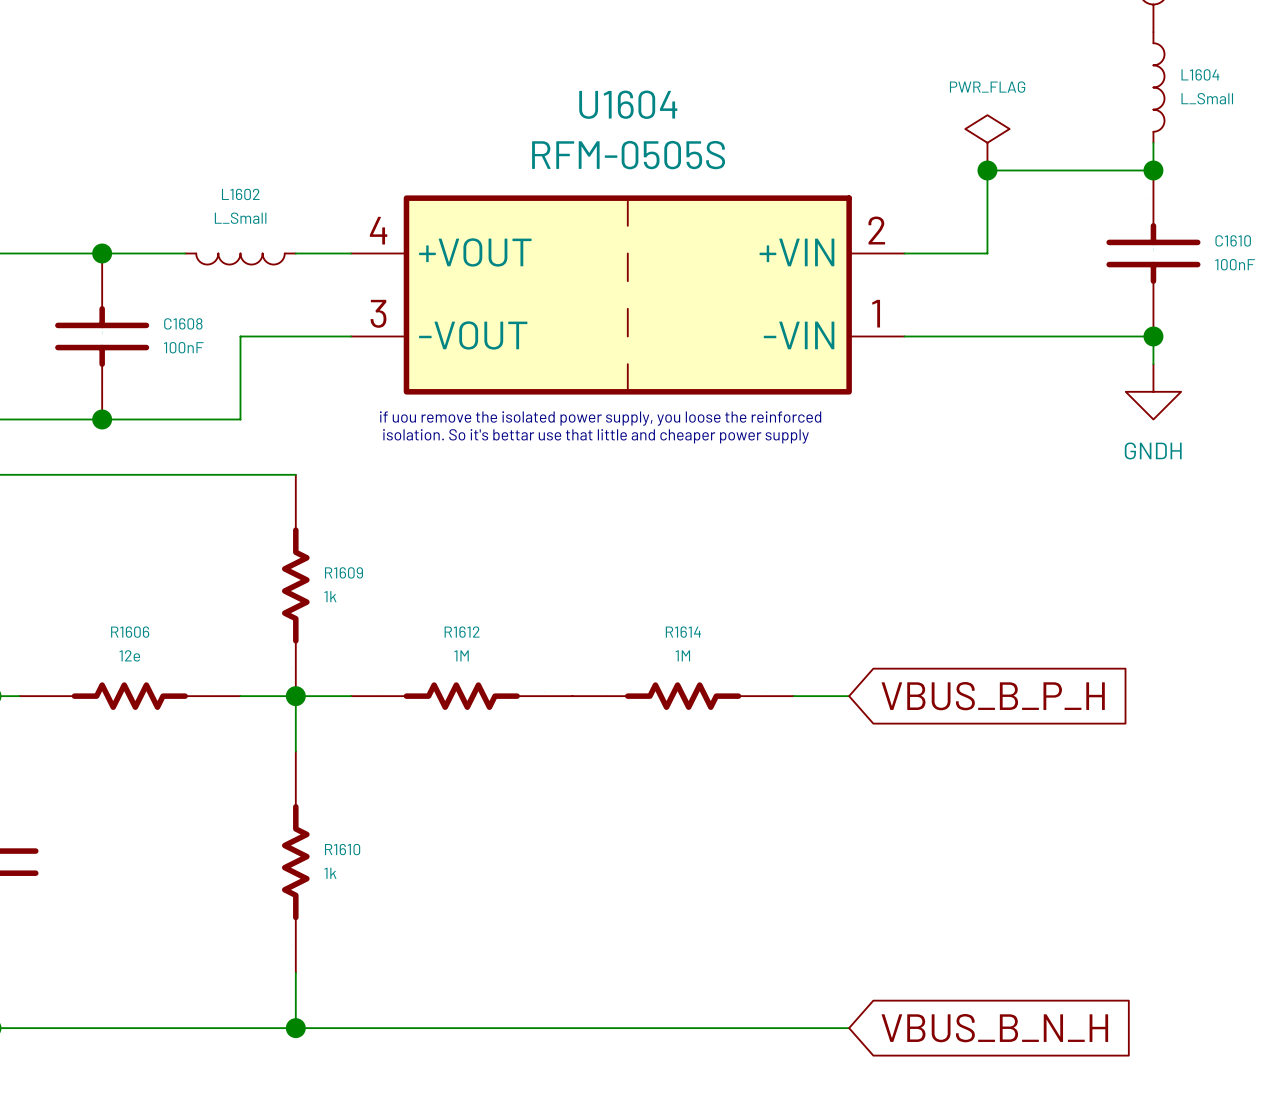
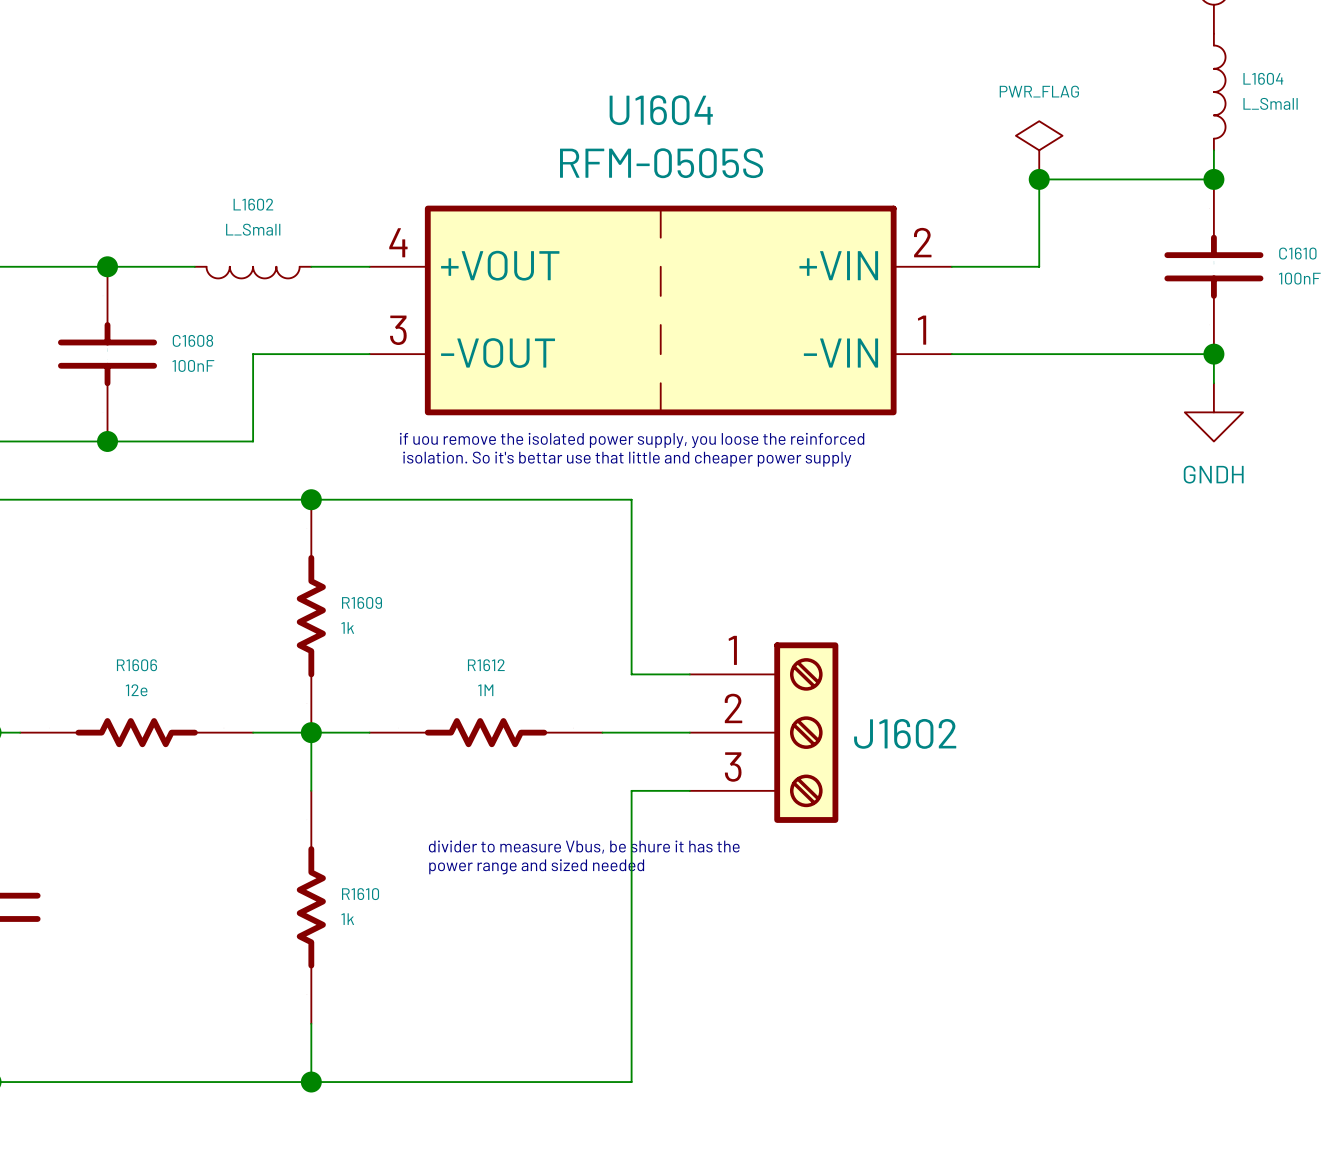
wire: none -> (311, 499) (631, 499) (631, 674) (689, 674)
junction: none -> (311, 499)
R1614: 1M (683, 696) -> none
J1602: none -> (764, 732)
wire: (793, 696) (849, 696) -> none
global label: VBUS_B_P_H (993, 696) -> none
text: none -> divider to measure Vbus, be shure it has the (584, 847)
text: none -> power range and sized needed (536, 866)
wire: (600, 1028) (849, 1028) -> (631, 1082) (631, 790) (689, 790)
global label: VBUS_B_N_H (994, 1028) -> none

